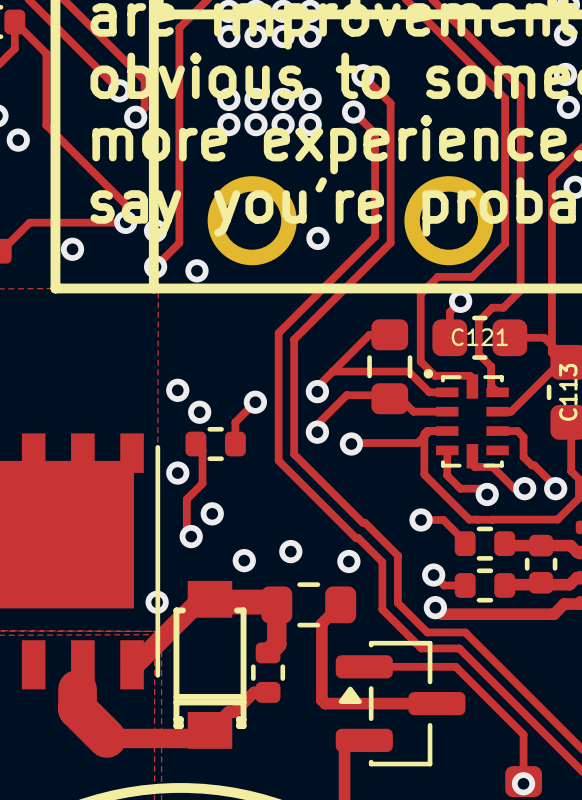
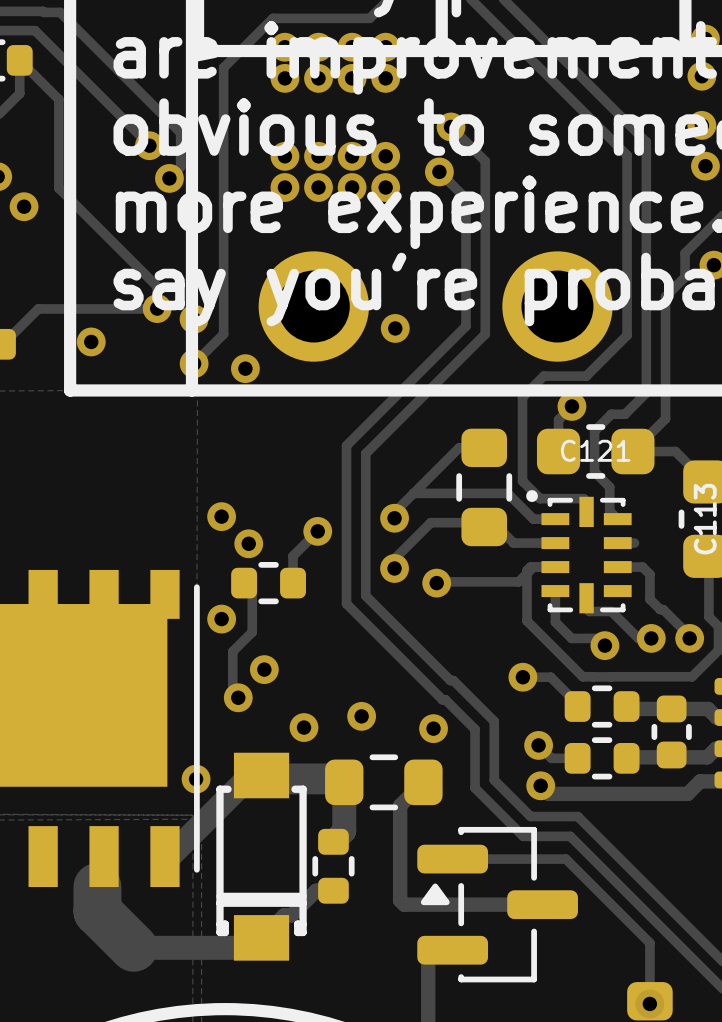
track: (551, 196) (551, 352) (560, 361) (511, 411) -> (685, 277) (665, 296) (665, 418) (632, 451) (646, 464)

